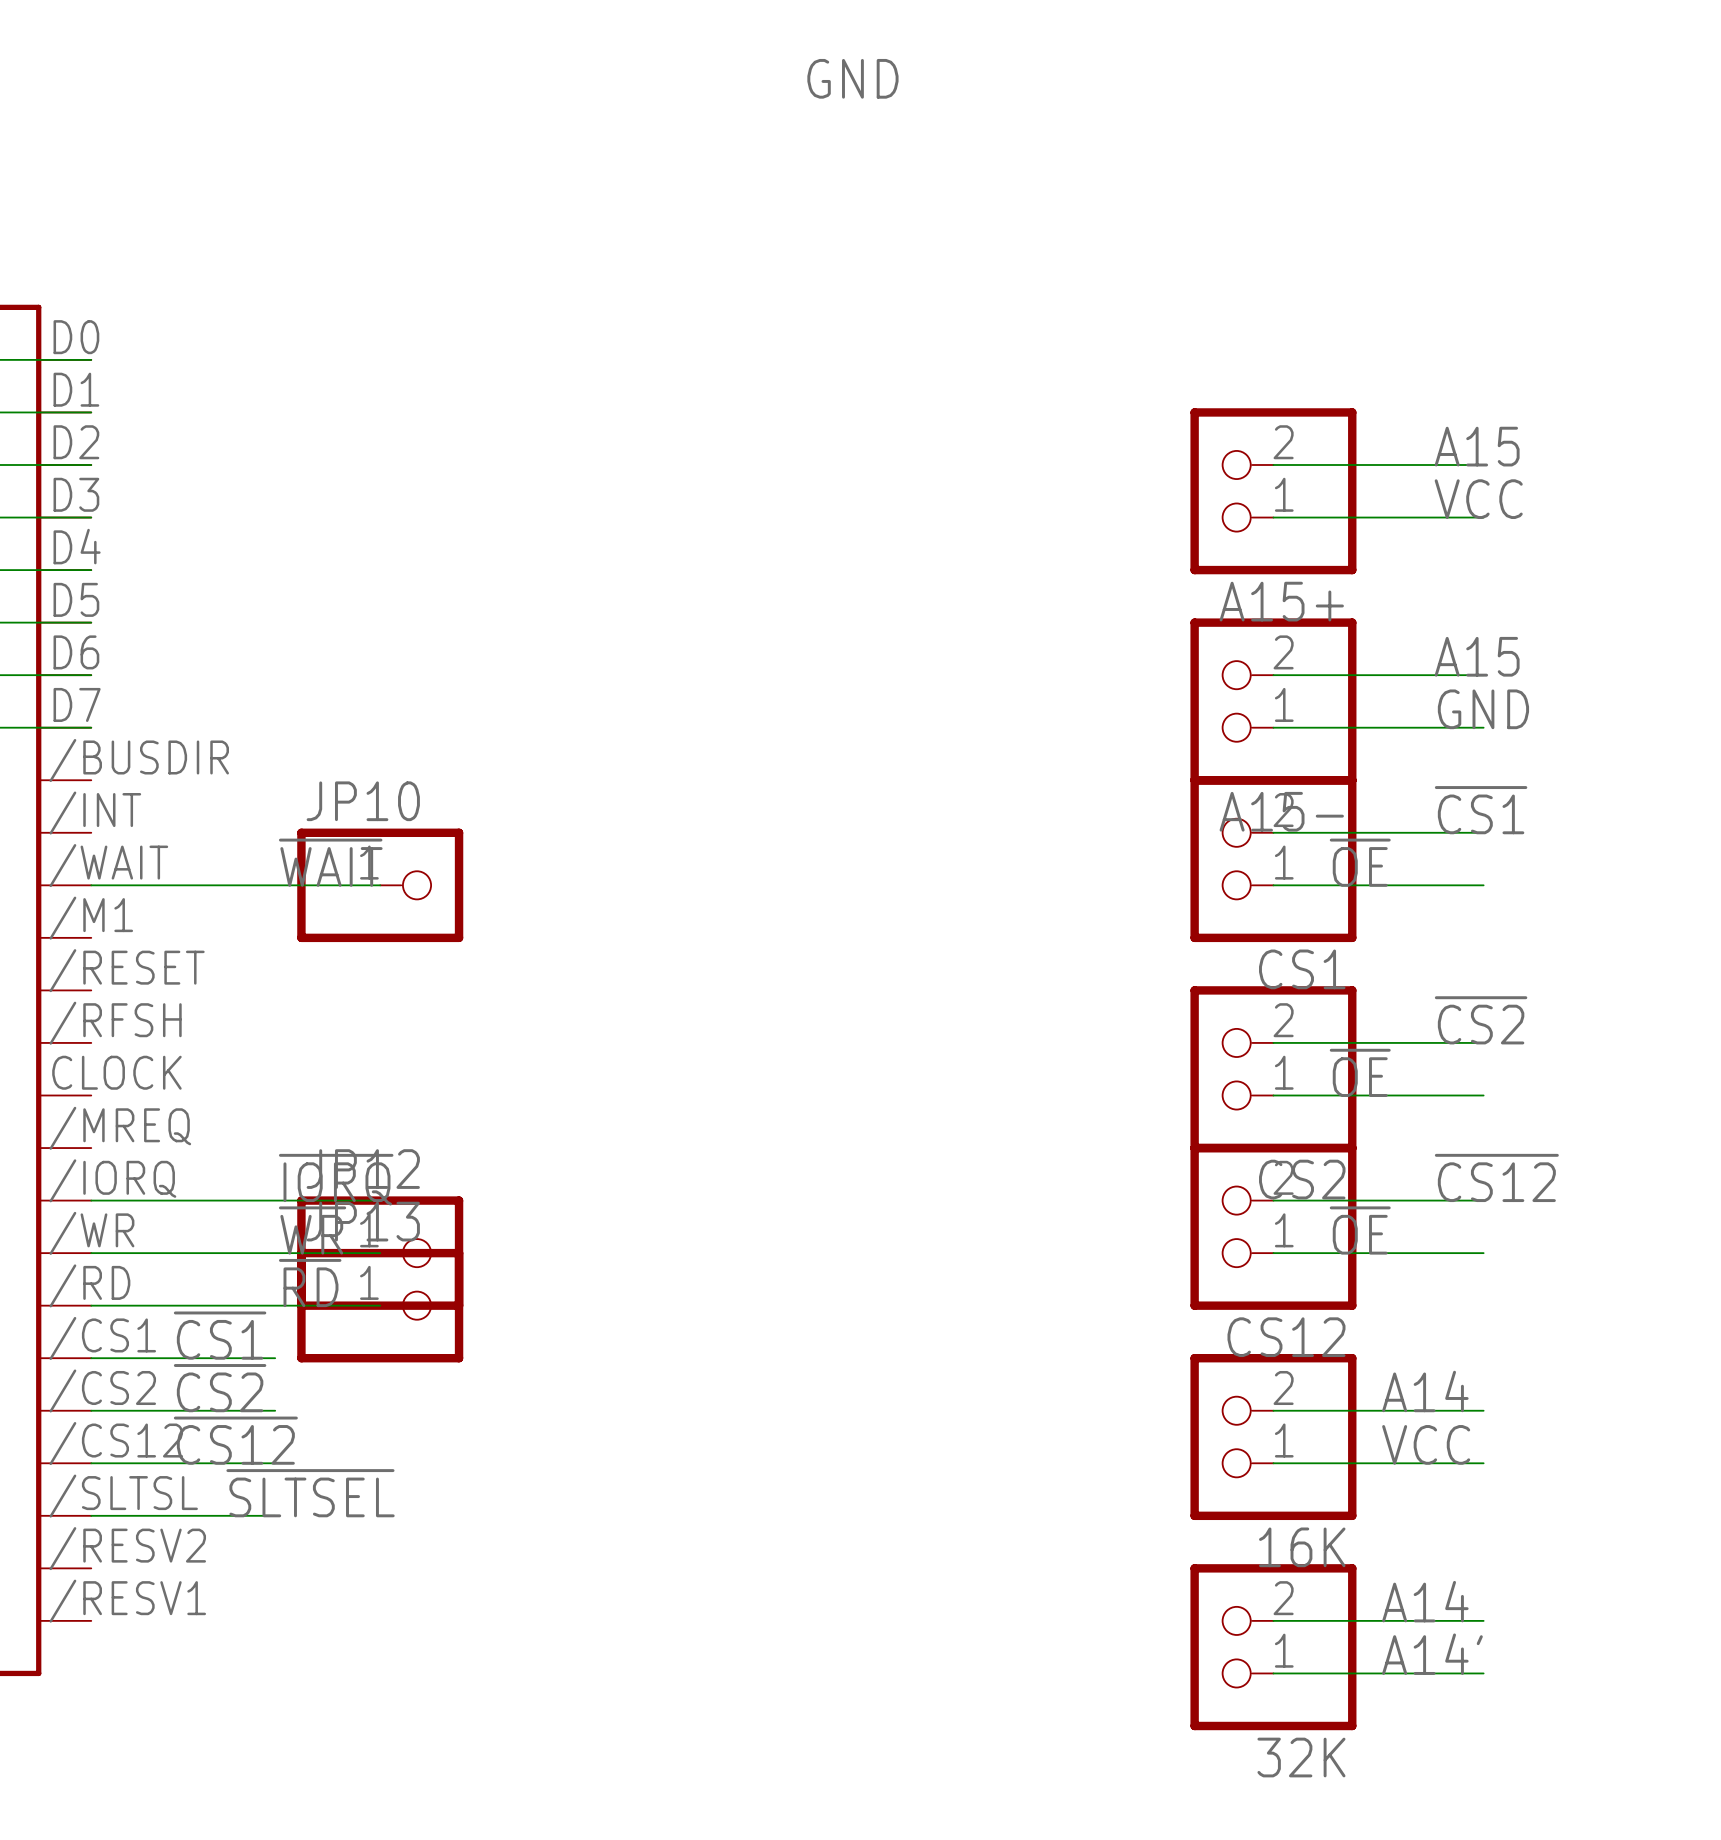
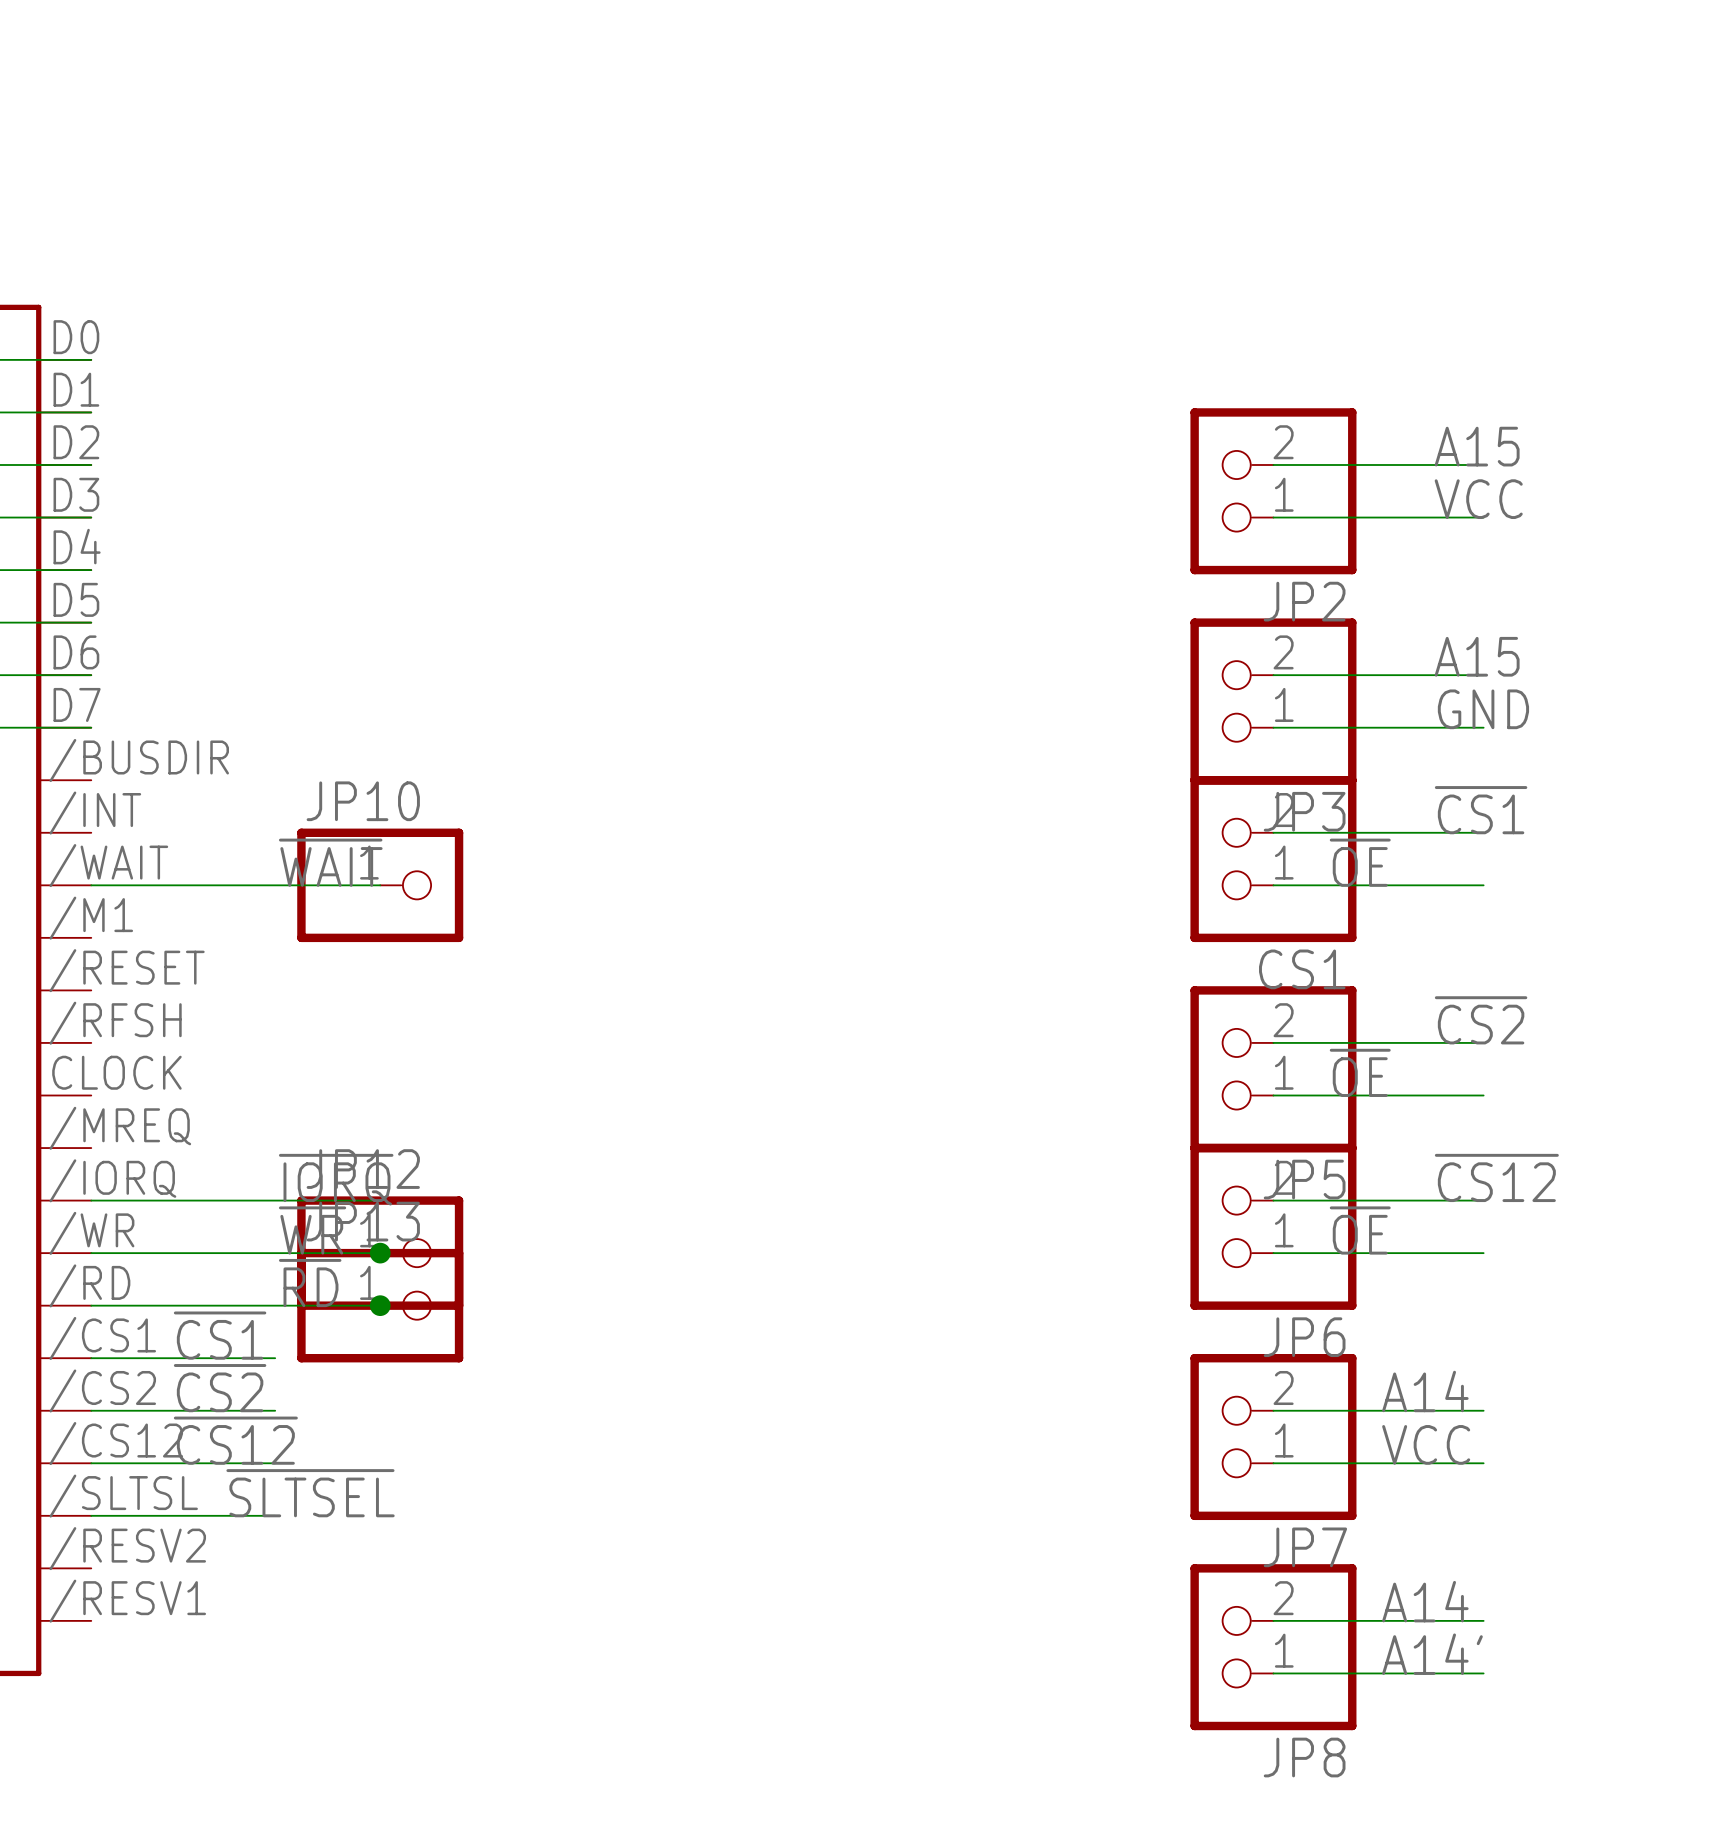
label: GND (852, 78) -> none
A15+ name: A15+ (1281, 601) -> JP2 (1304, 601)
A15- name: A15- (1281, 811) -> JP3 (1304, 811)
CS2 name: CS2 (1302, 1179) -> JP5 (1304, 1179)
junction: none -> (380, 1253)
junction: none -> (380, 1305)
CS12 name: CS12 (1286, 1337) -> JP6 (1304, 1337)
16K name: 16K (1302, 1547) -> JP7 (1305, 1547)
32K name: 32K (1301, 1757) -> JP8 (1304, 1757)

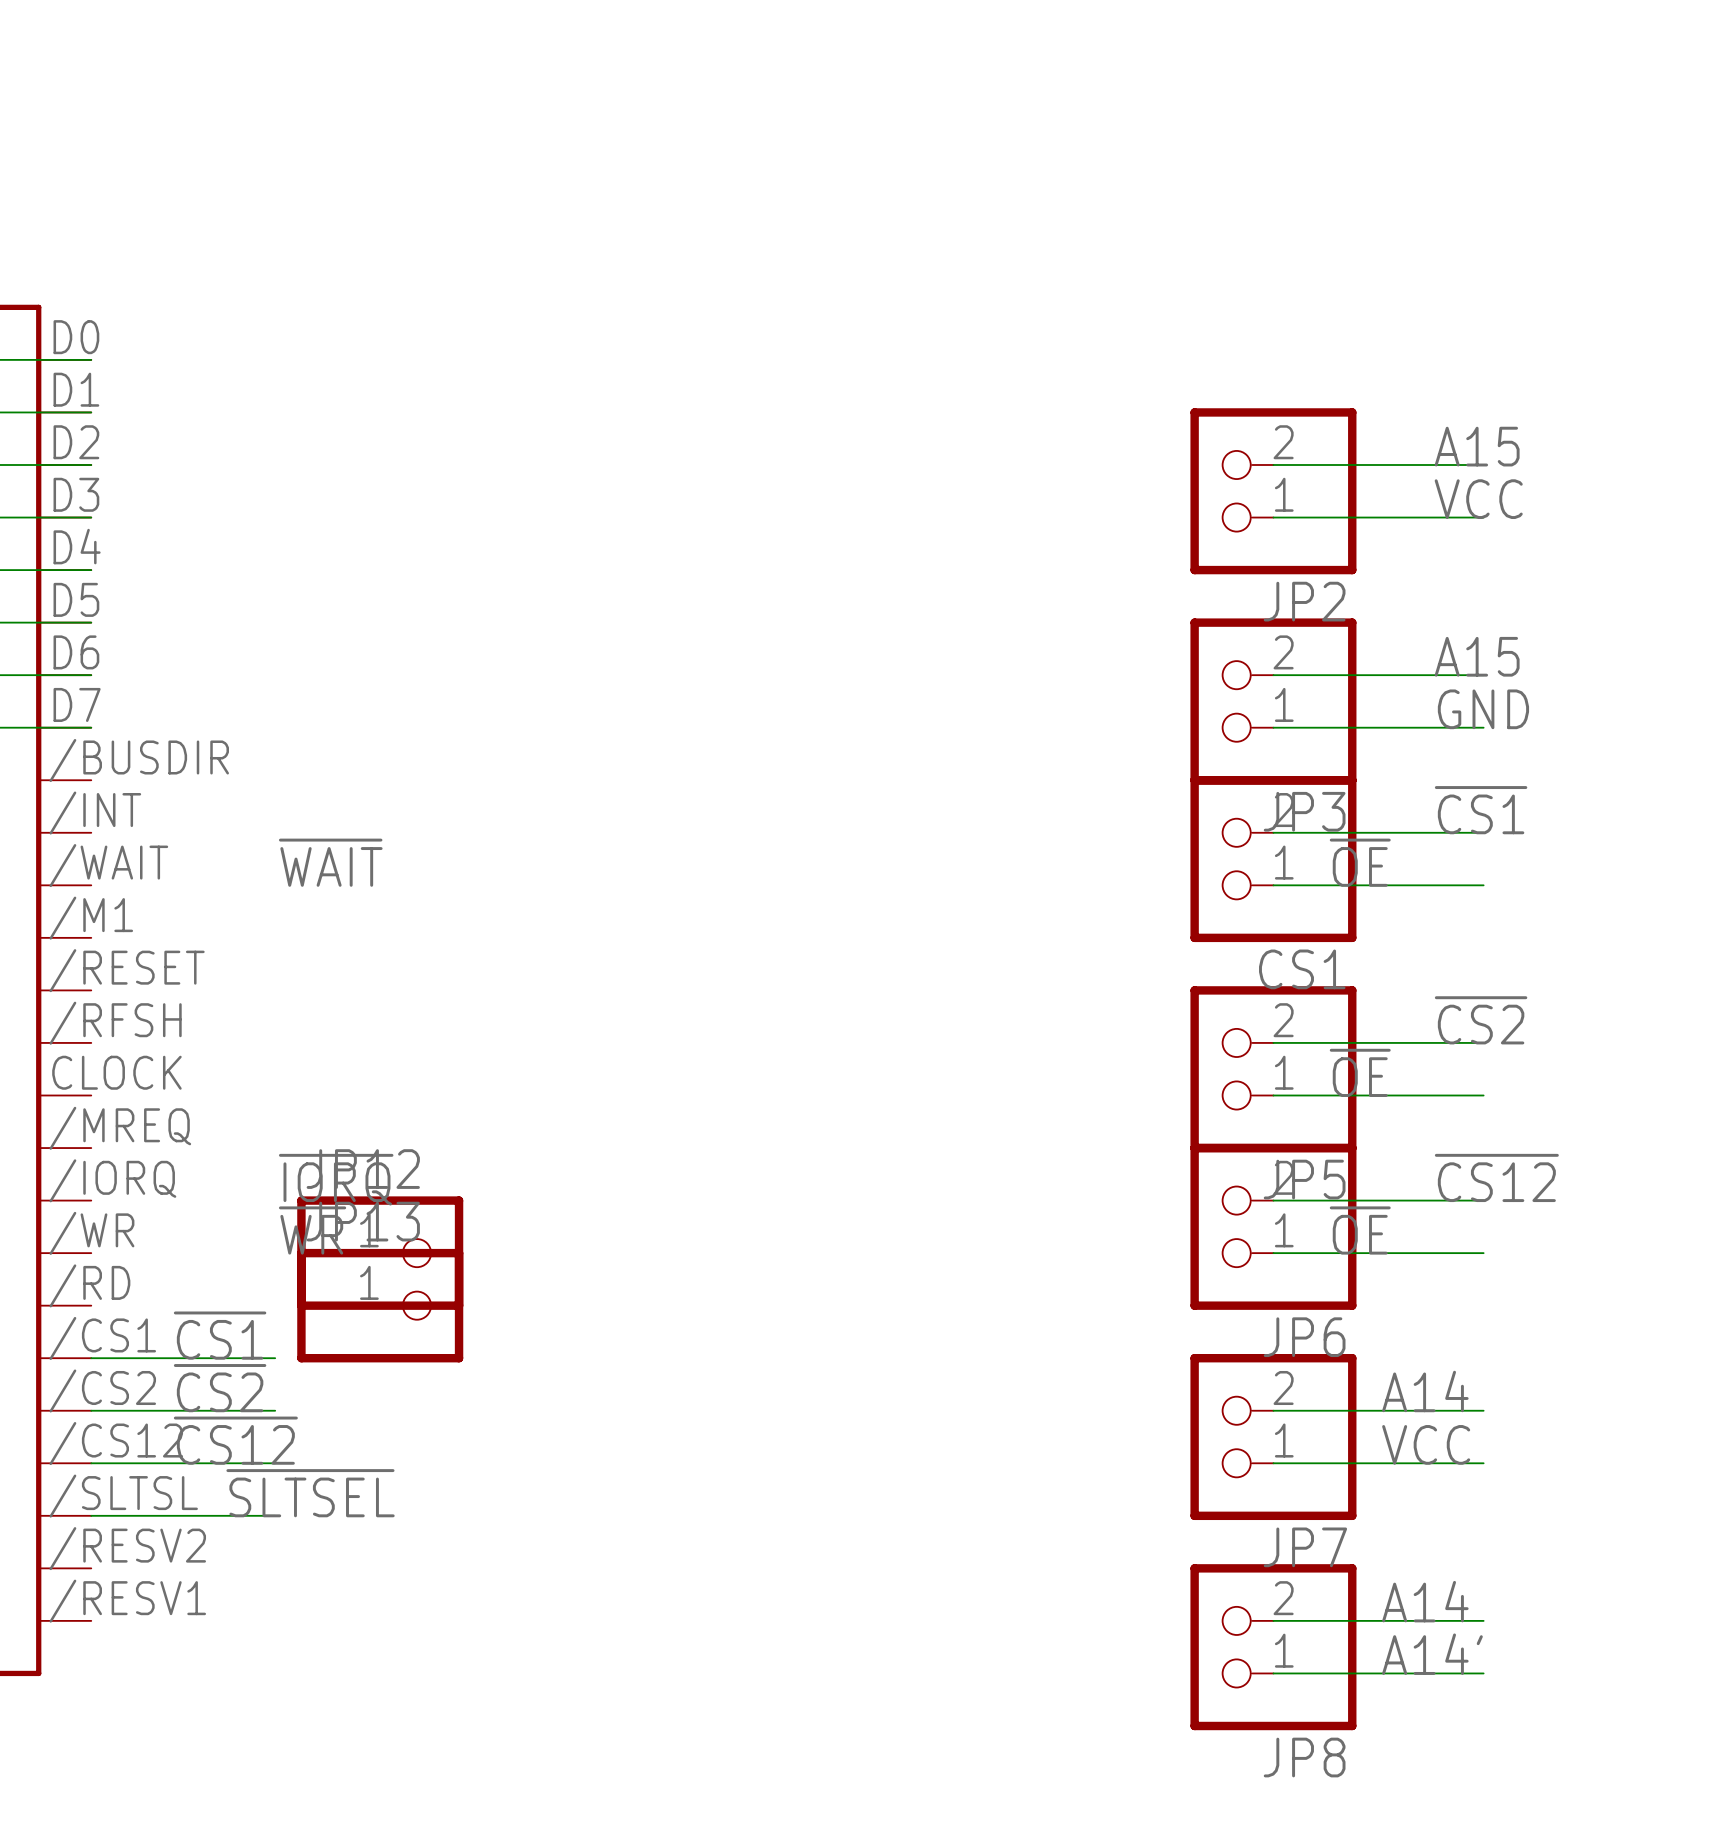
wire: (91, 885) (380, 885) -> none
JP10: (380, 885) -> none
wire: (91, 1200) (380, 1200) -> none
wire: (91, 1253) (380, 1253) -> none
junction: (380, 1253) -> none
label: ~{RD} (310, 1283) -> none
wire: (91, 1305) (380, 1305) -> none
junction: (380, 1305) -> none

